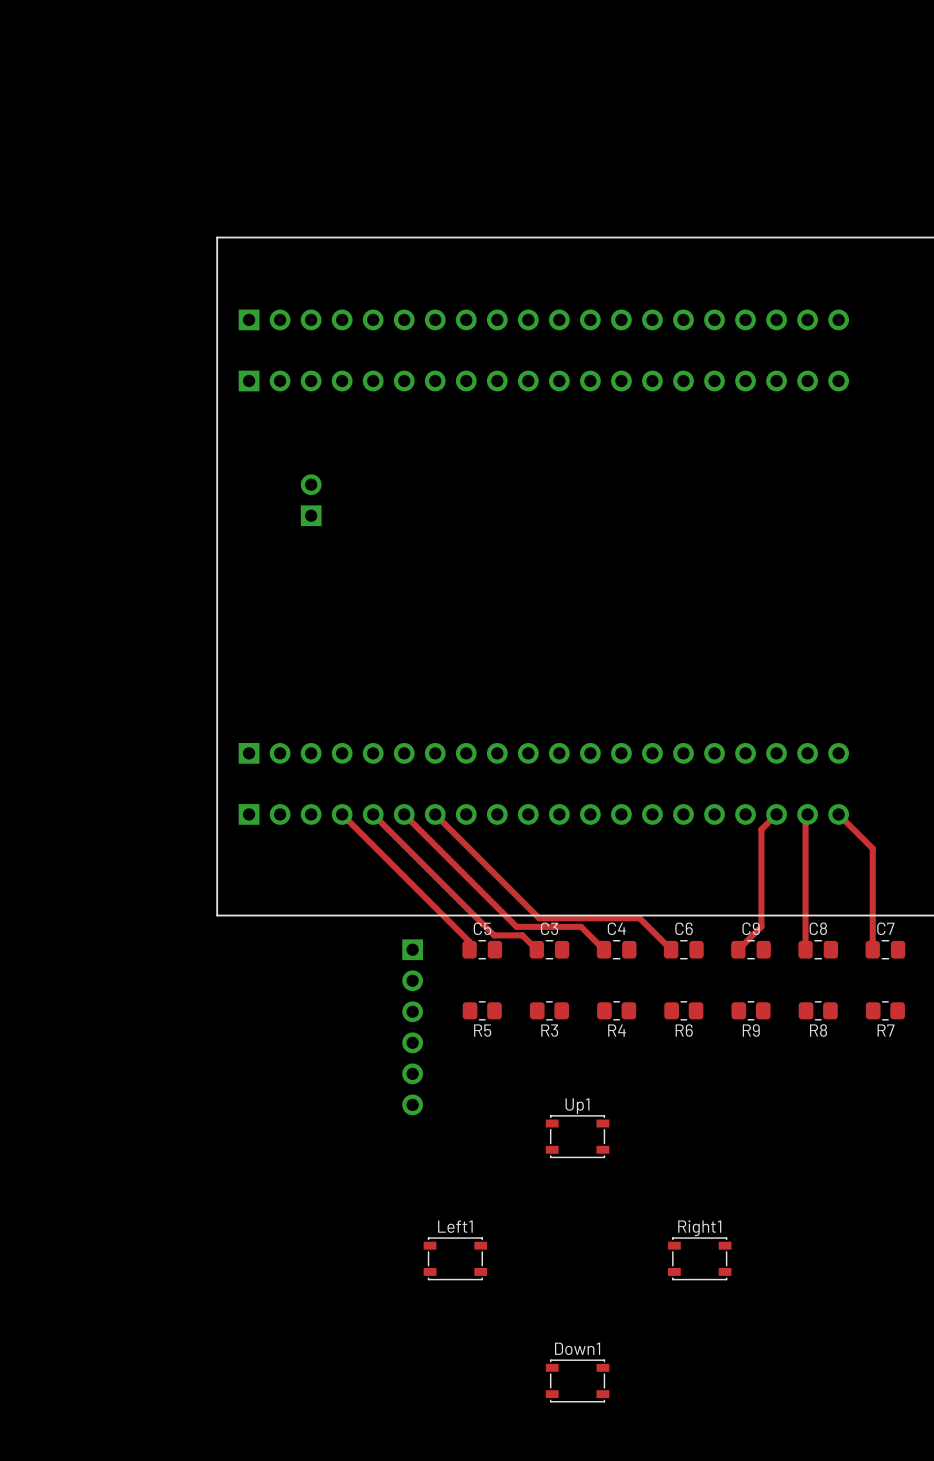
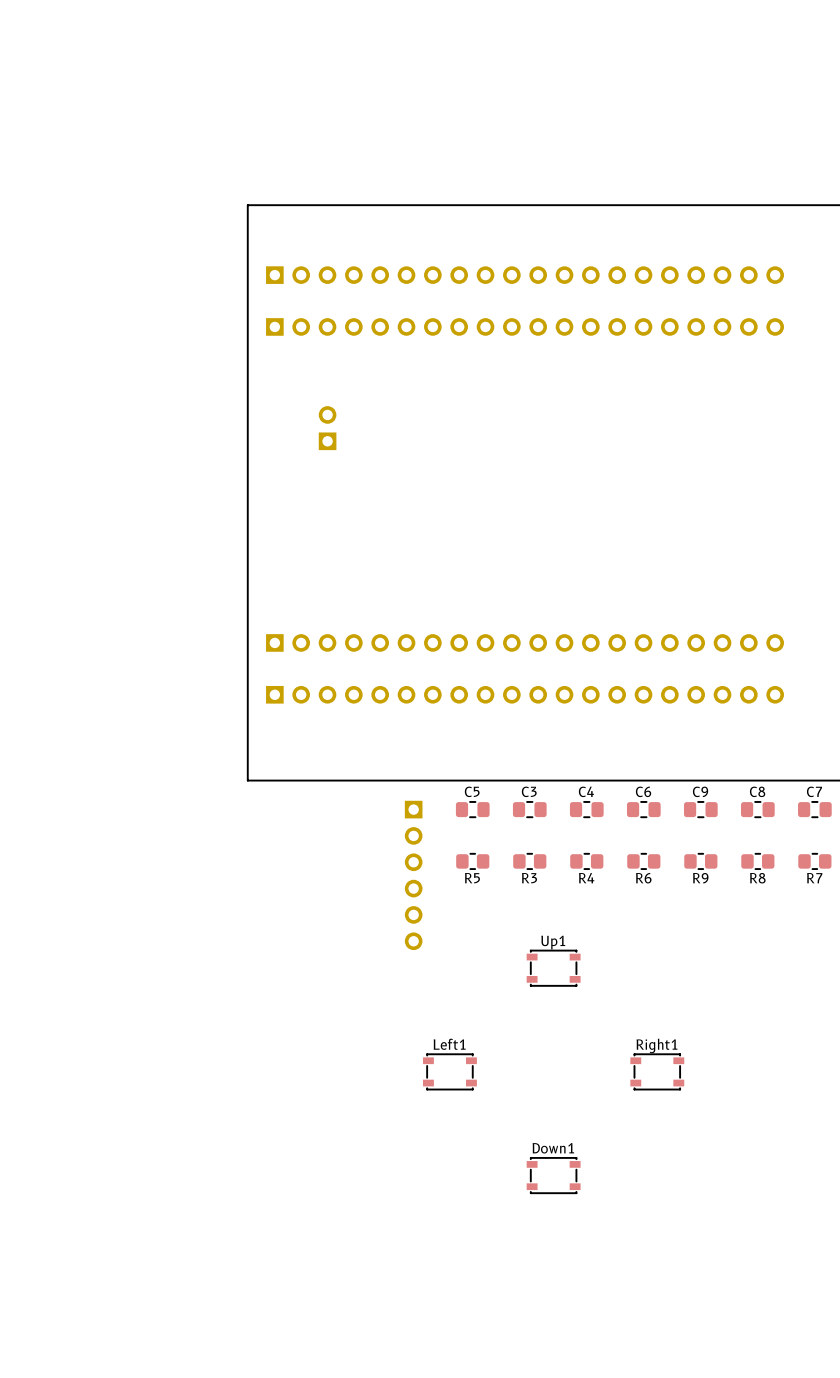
track: (342, 814) (469, 941) (469, 949) -> none
track: (373, 814) (494, 935) (522, 935) (536, 949) -> none
track: (404, 814) (516, 926) (581, 926) (603, 949) -> none
track: (435, 814) (539, 918) (639, 918) (671, 949) -> none
track: (776, 814) (761, 829) (761, 926) (738, 949) -> none
track: (807, 814) (805, 816) (805, 949) -> none
track: (838, 814) (872, 848) (872, 949) -> none

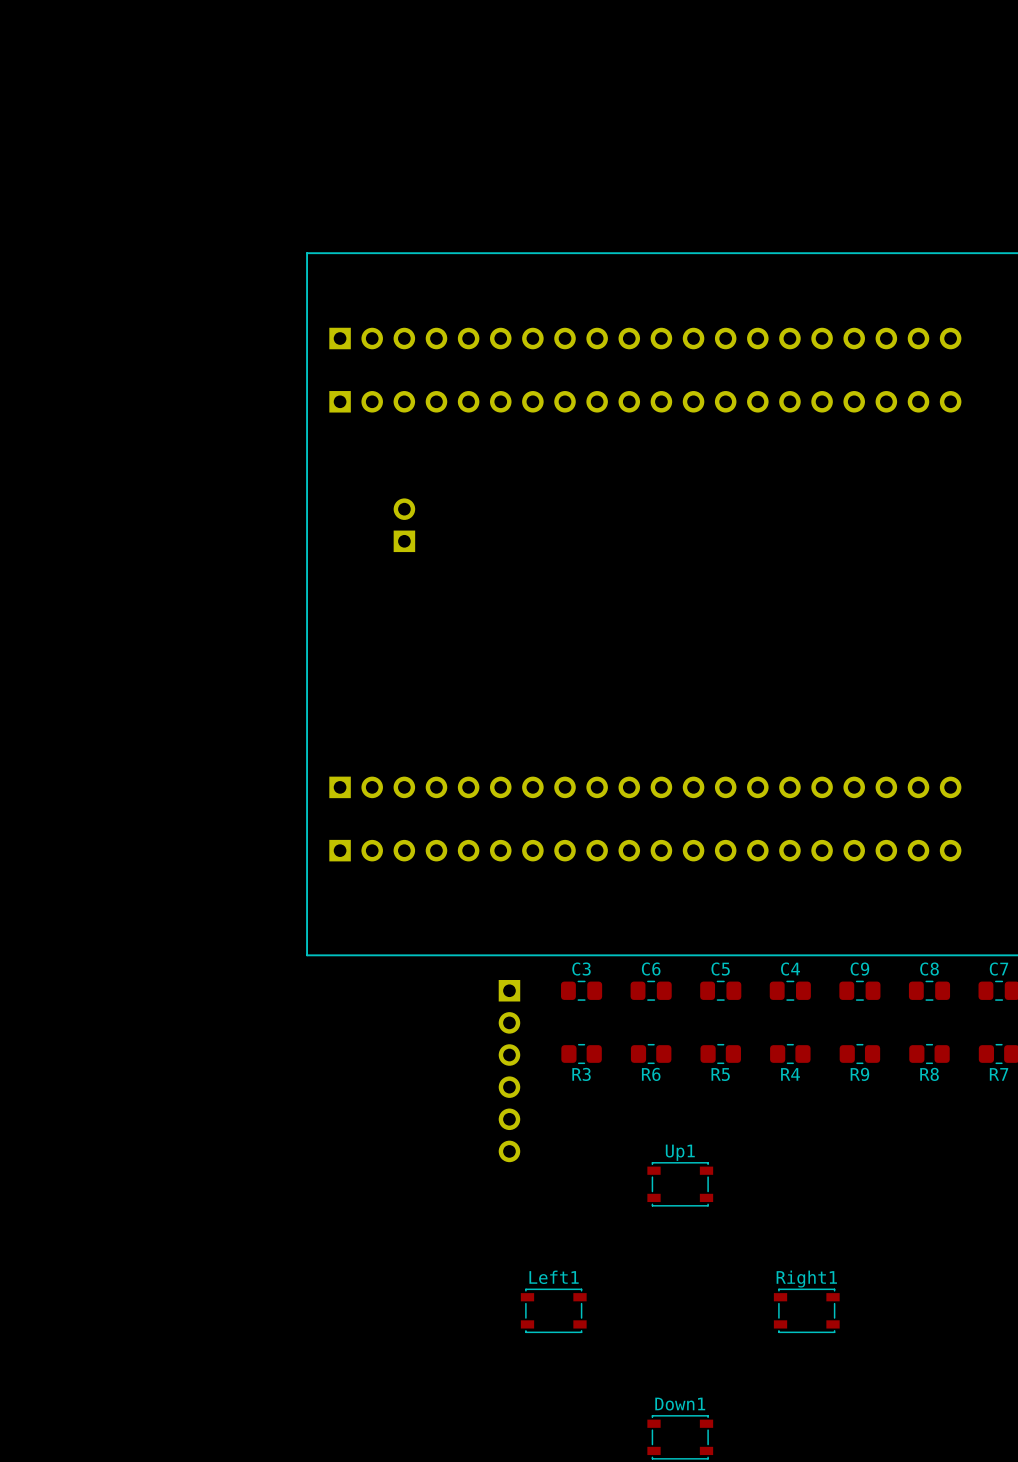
C5 name: C5 (472, 791) -> C3 (581, 969)
C3 name: C3 (529, 791) -> C6 (651, 969)
C4 name: C4 (586, 791) -> C5 (720, 969)
C6 name: C6 (643, 791) -> C4 (790, 969)
R5 name: R5 (472, 878) -> R3 (581, 1074)
R3 name: R3 (529, 878) -> R6 (651, 1074)
R4 name: R4 (586, 878) -> R5 (720, 1074)
R6 name: R6 (643, 878) -> R4 (790, 1074)

